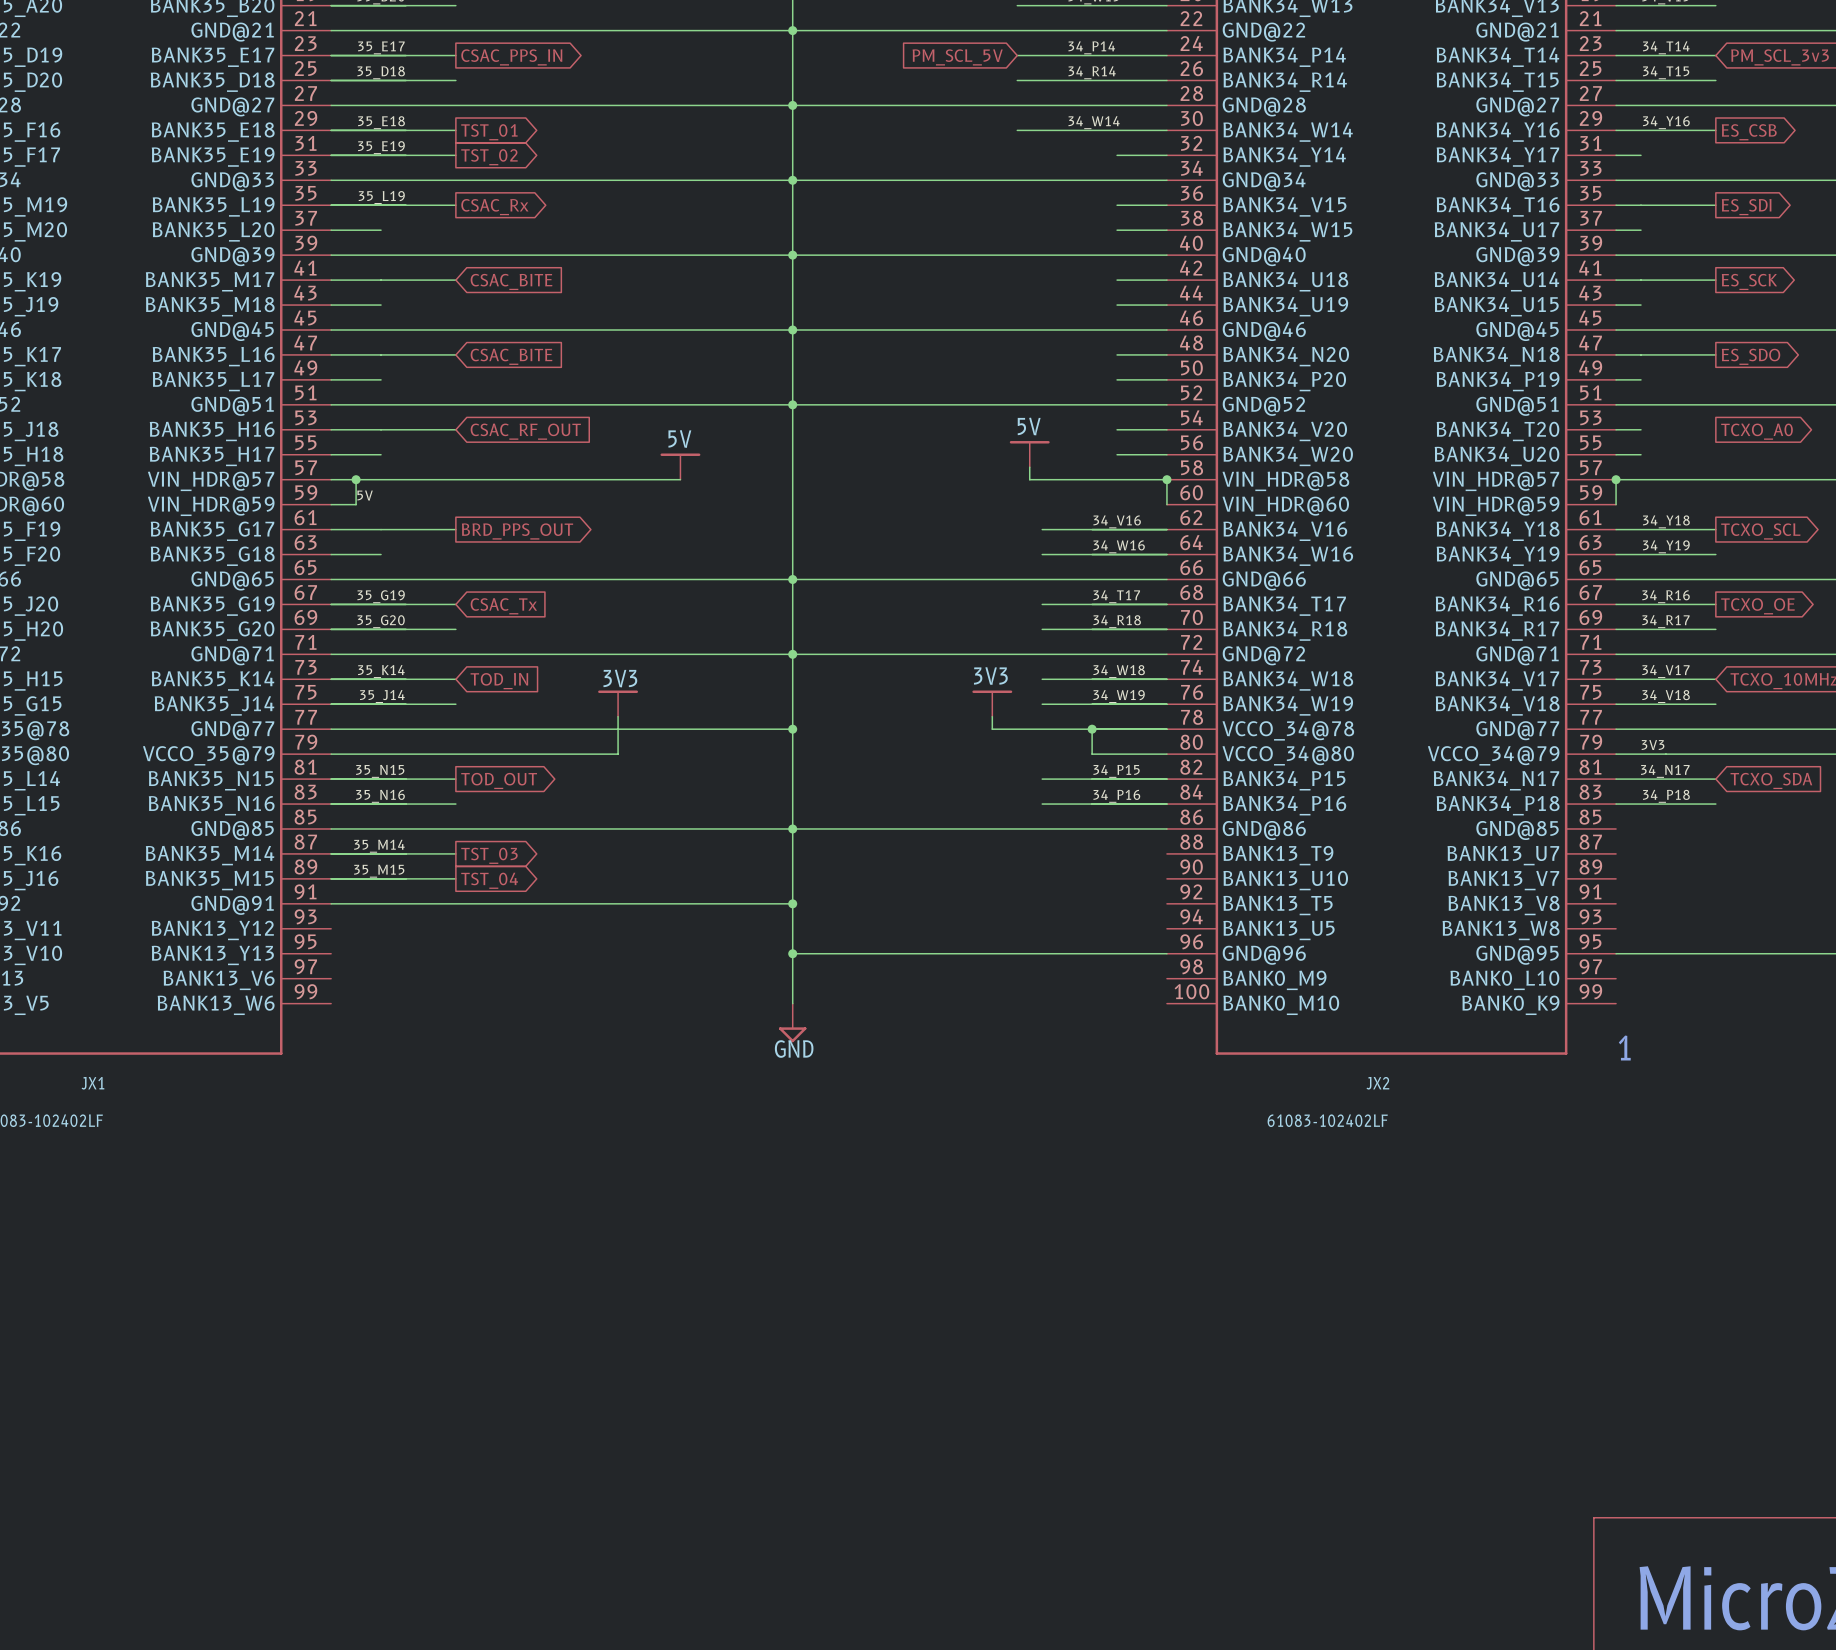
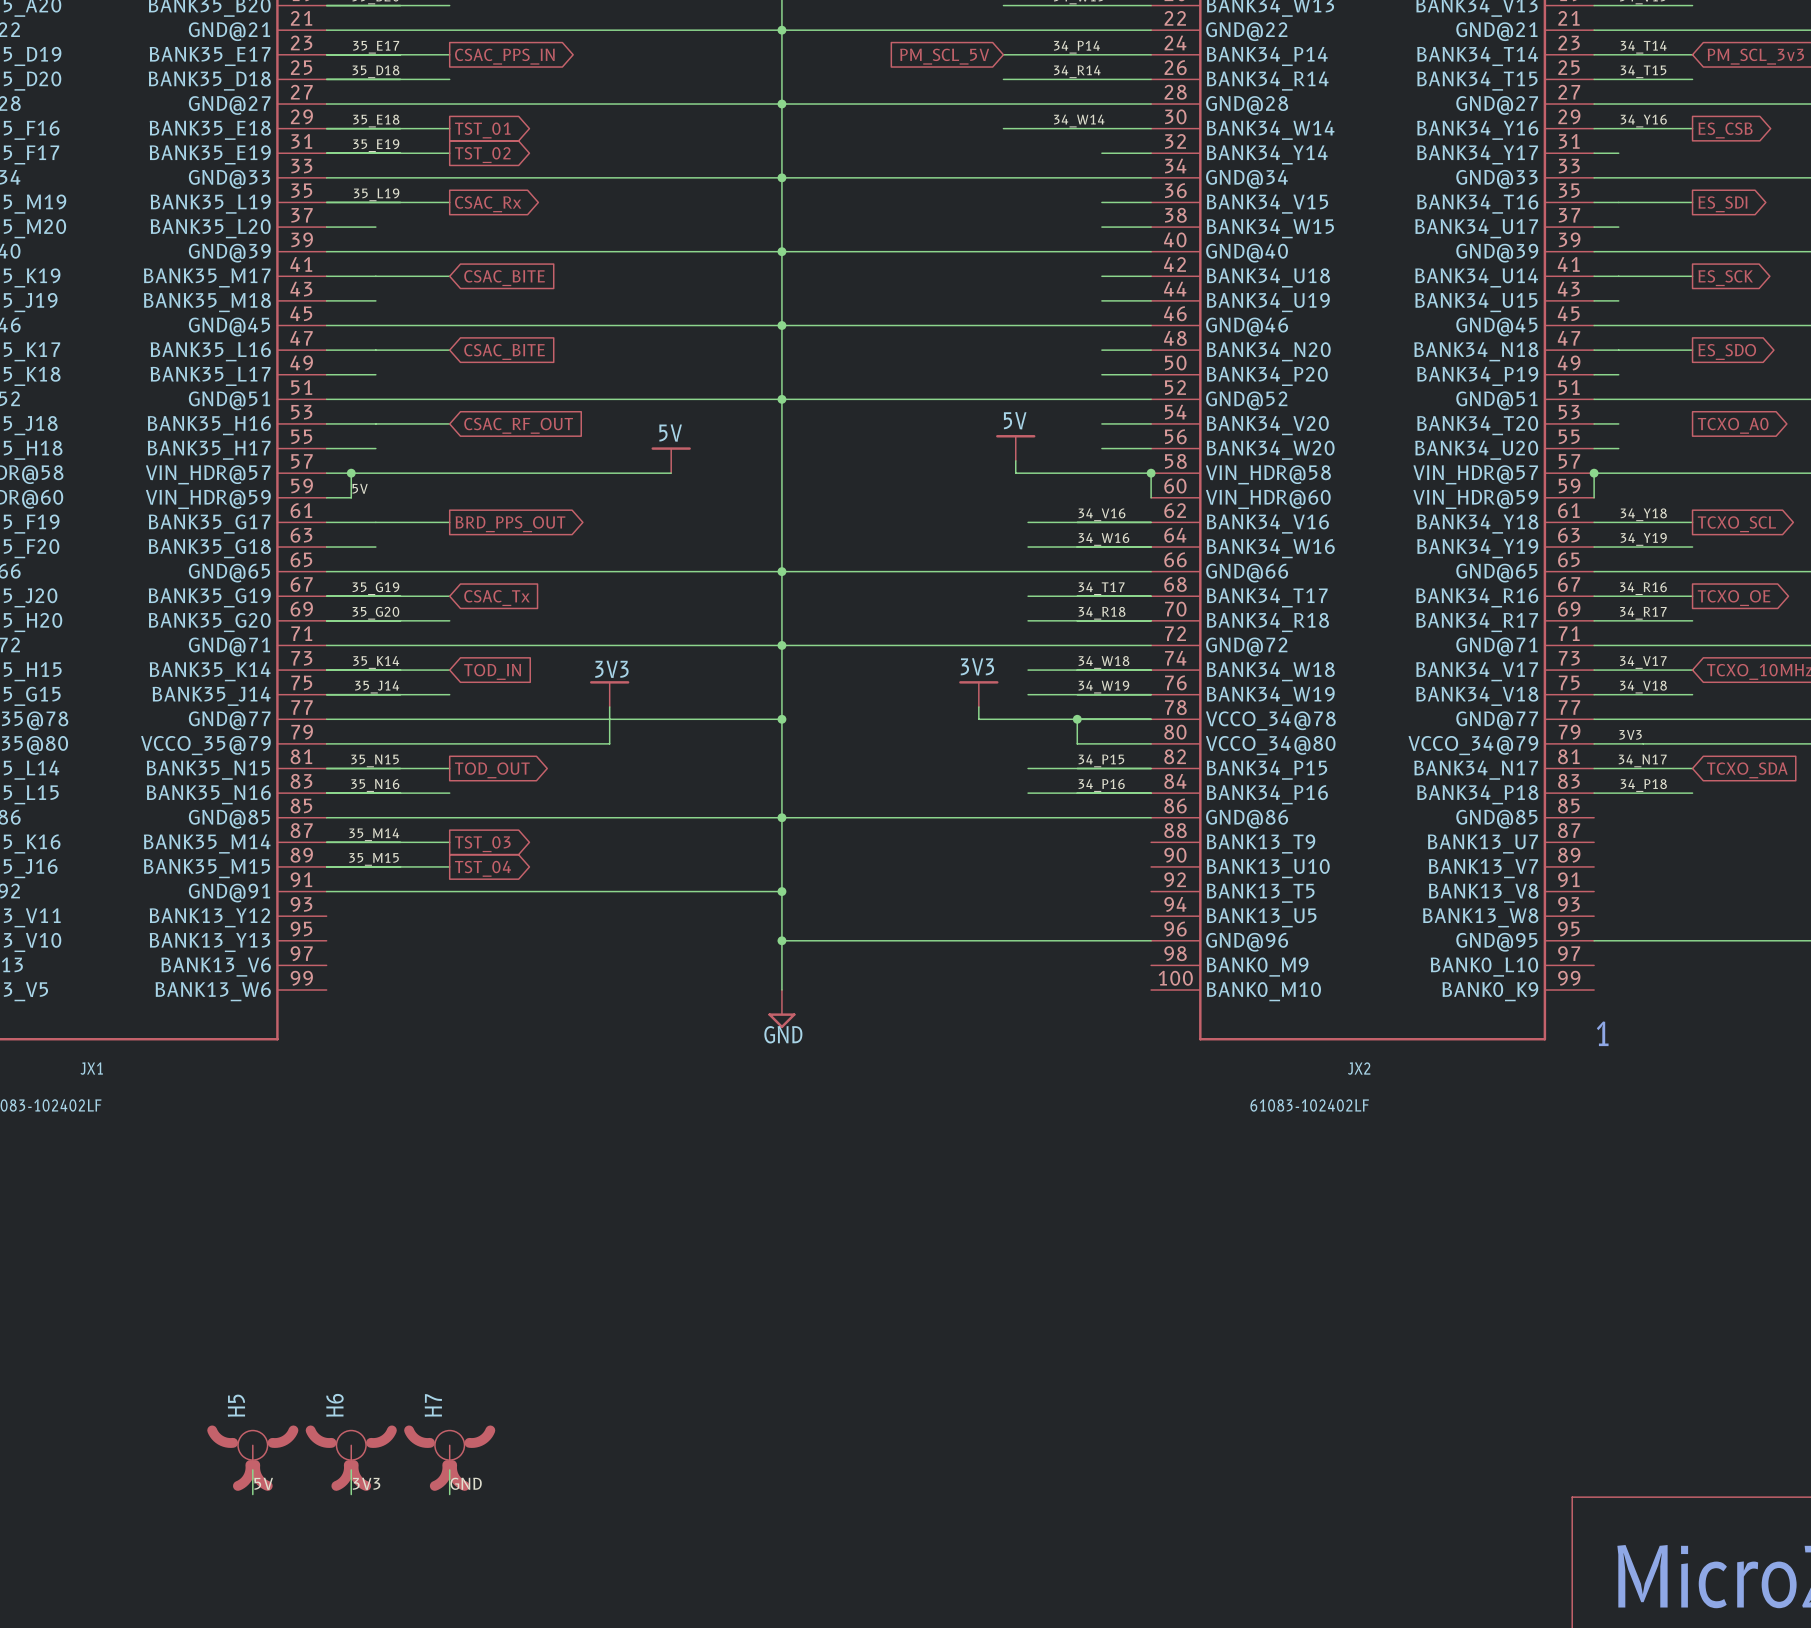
H5: none -> (252, 1458)
H6: none -> (351, 1458)
H7: none -> (449, 1458)
wire: none -> (252, 1469) (252, 1494)
wire: none -> (351, 1469) (351, 1494)
wire: none -> (449, 1469) (449, 1494)
label: none -> 5V (263, 1483)
label: none -> 3V3 (366, 1483)
label: none -> GND (466, 1483)

